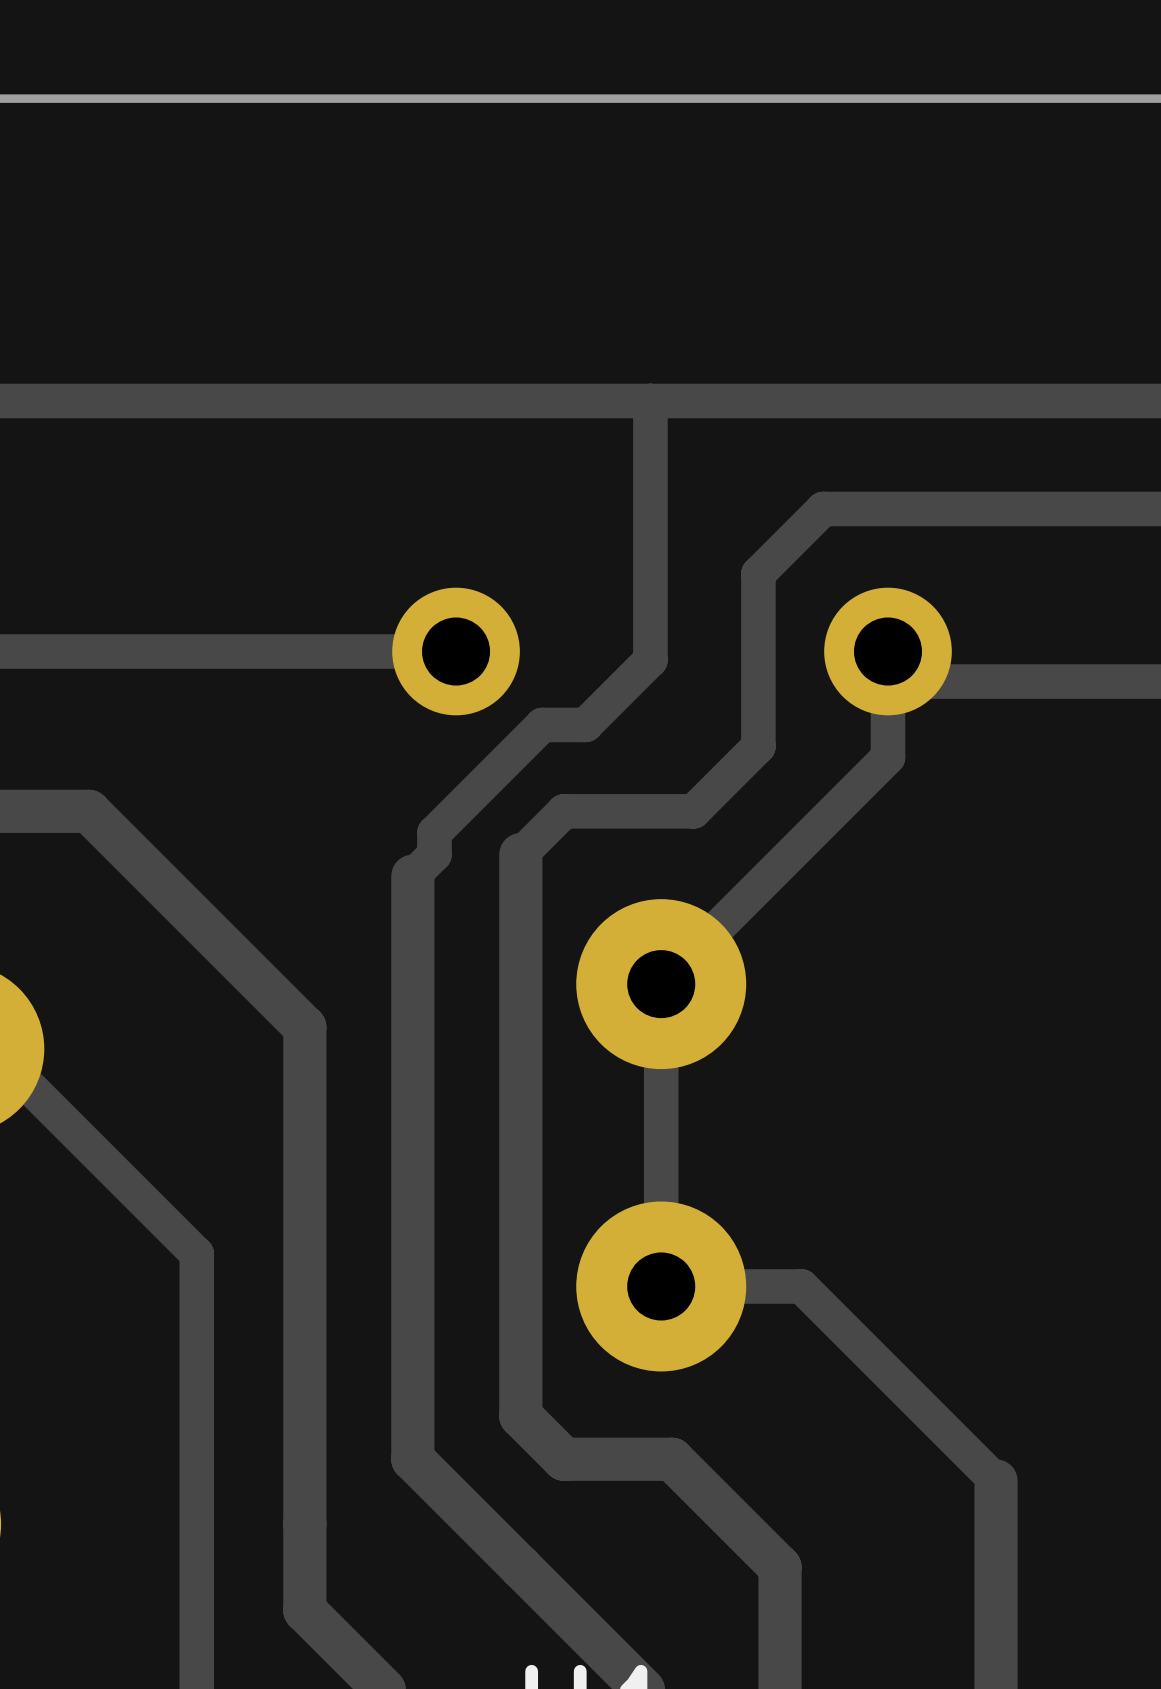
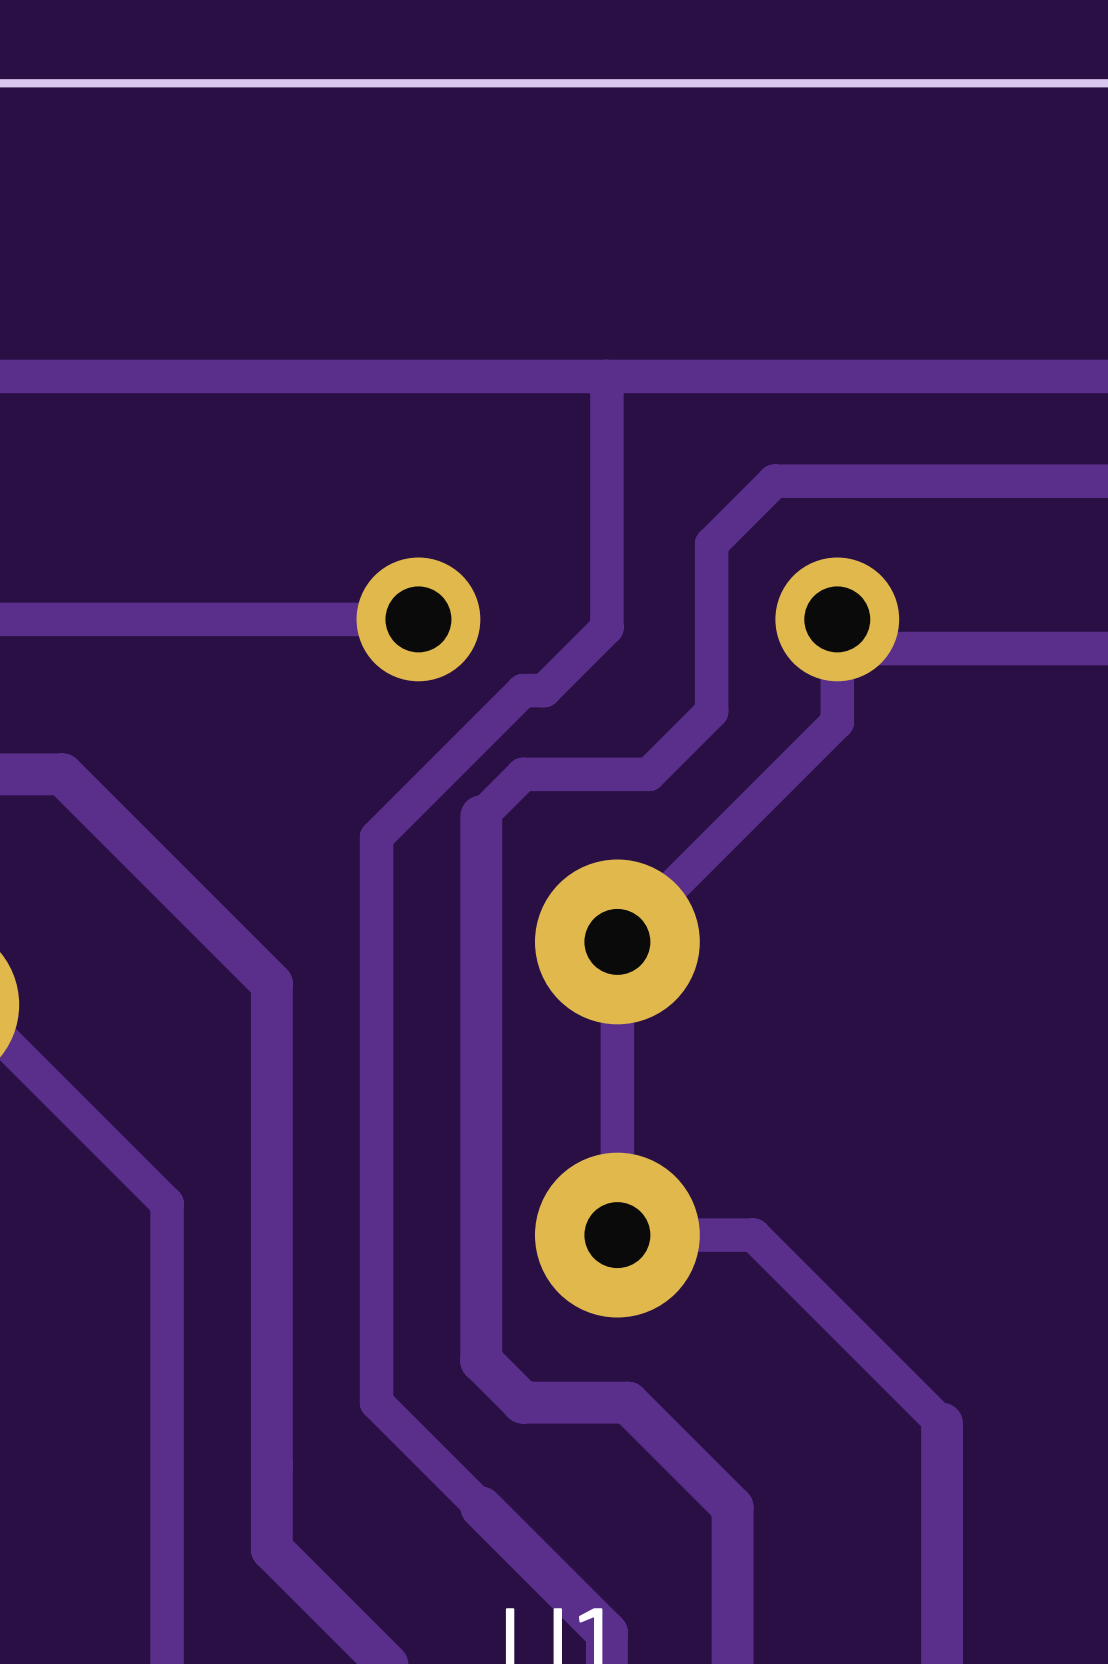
track: (564, 724) (542, 724) (434, 832) (434, 854) -> (523, 690) (397, 816)
track width: thick (412, 876) (412, 1459) (520, 1567) -> thin (376, 837) (376, 1402) (481, 1507)

